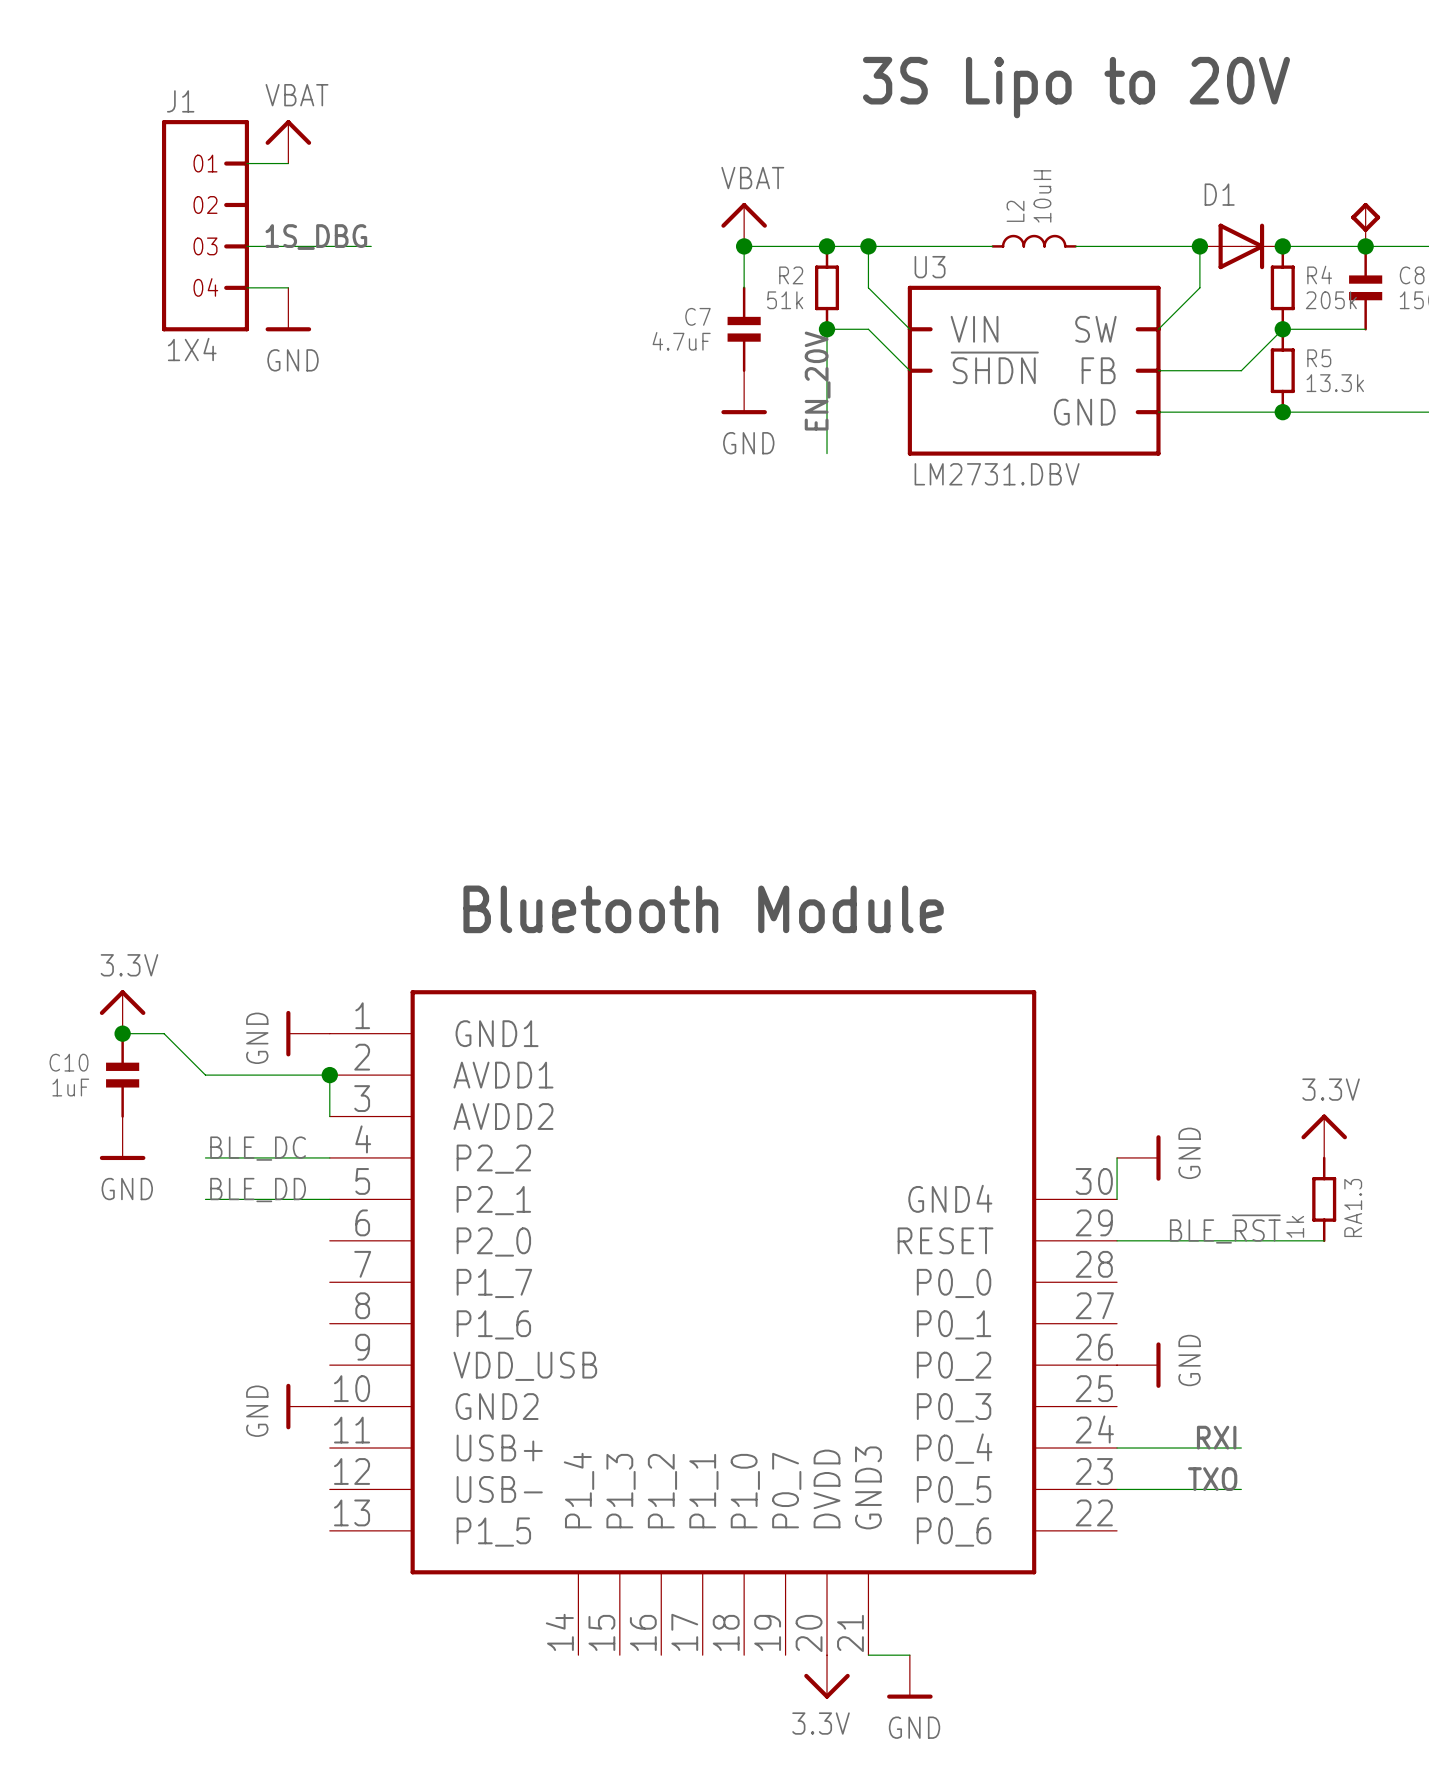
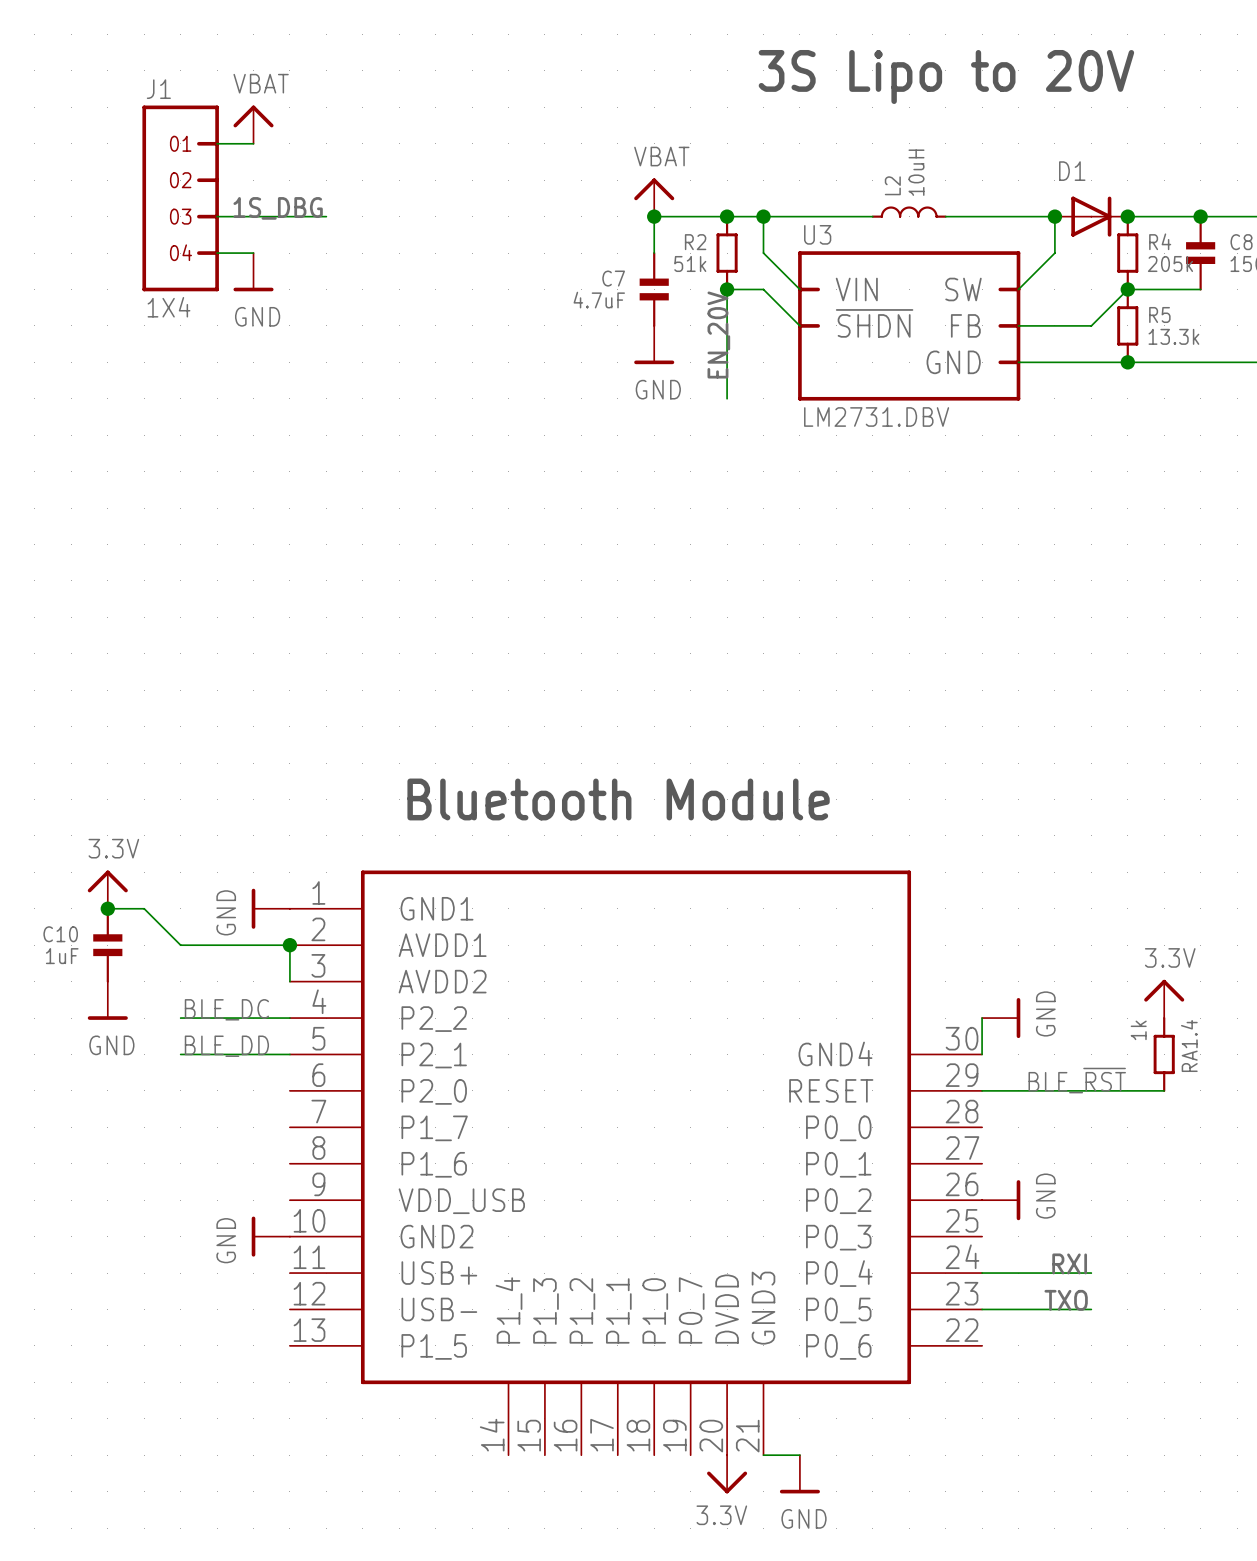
part: (1365, 224) -> none
RA1.3 name: RA1.3 (1353, 1207) -> RA1.4 (1189, 1045)
RA1.3 value position: 1k (1295, 1226) -> 1k (1138, 1030)

